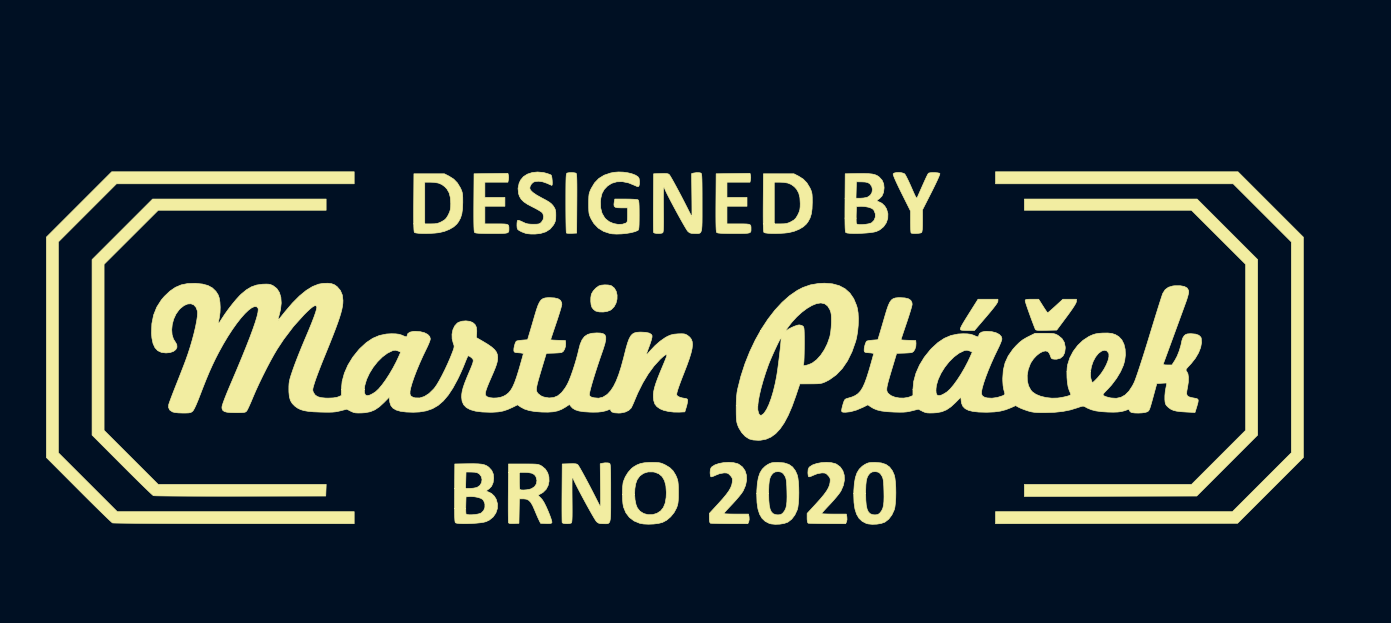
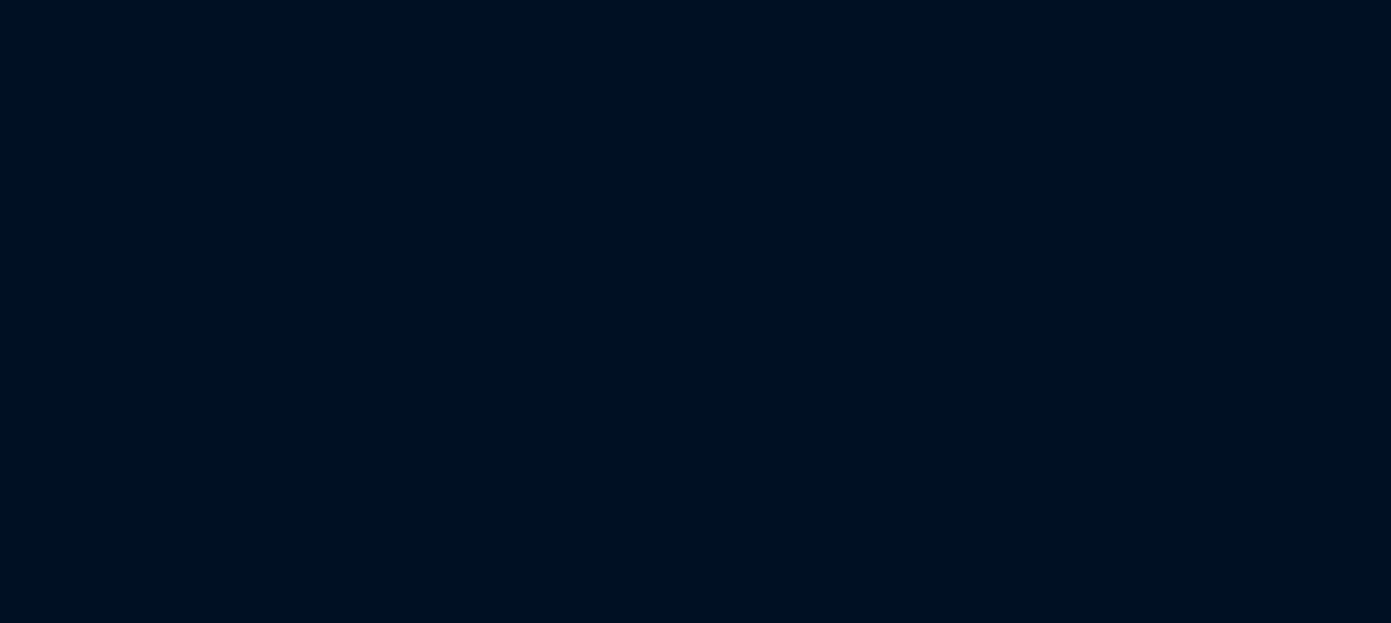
drawing: [46, 171, 1304, 525] -> none

